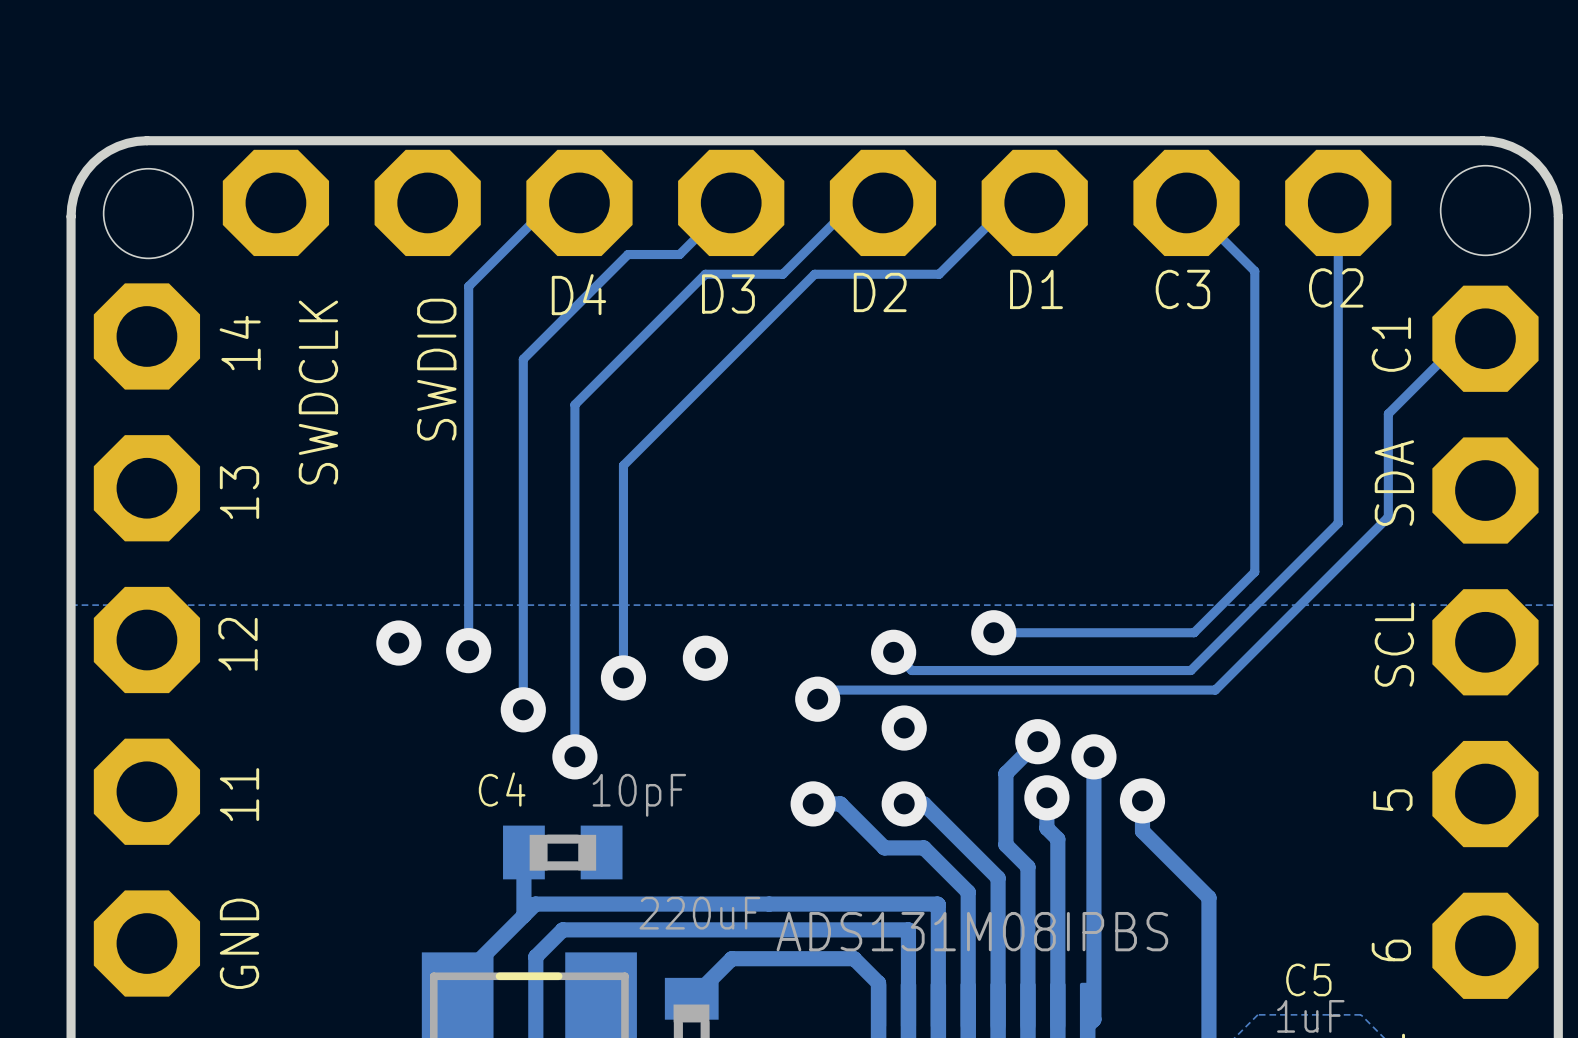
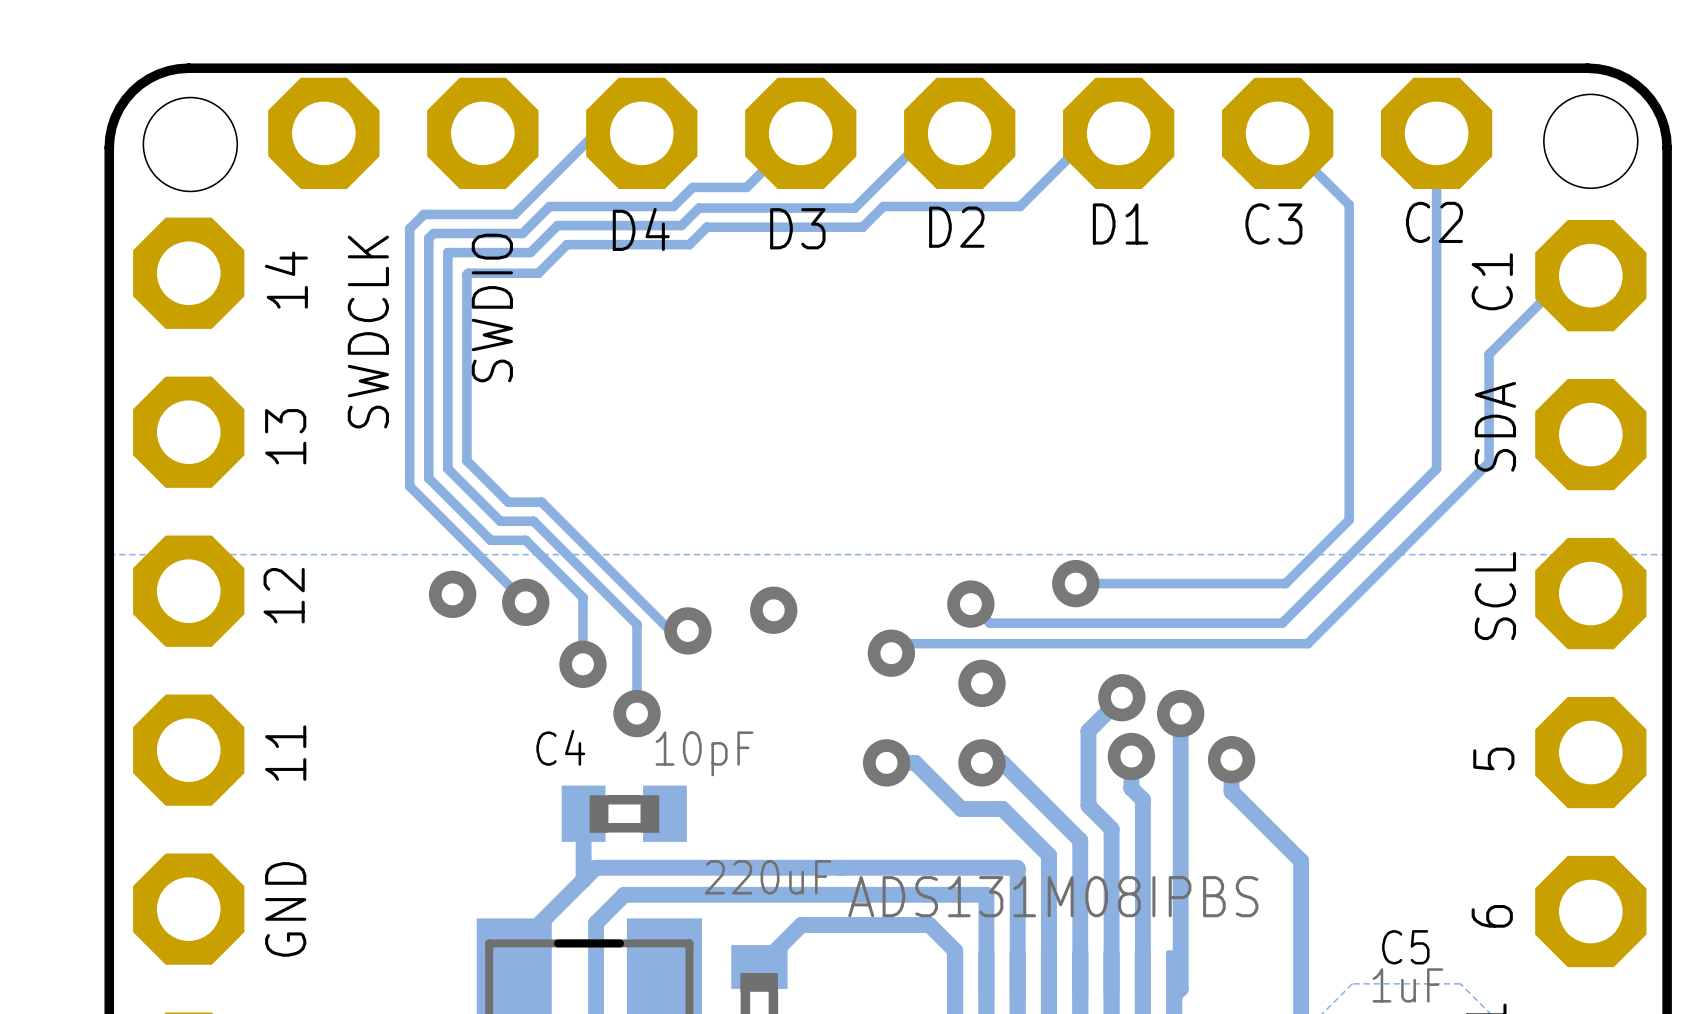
track: (552, 202) (468, 286) (468, 650) -> (613, 133) (595, 133) (514, 214) (424, 214) (409, 228) (409, 486) (525, 602)
track: (609, 272) (523, 359) (523, 646) -> (673, 206) (549, 206) (522, 233) (433, 233) (428, 238) (428, 478) (490, 540) (525, 540) (582, 597)
track: (940, 272) (814, 274) (623, 465) (623, 677) -> (1020, 206) (883, 206) (862, 227) (706, 227) (689, 244) (567, 244) (538, 273) (468, 273) (466, 274) (466, 460) (508, 502) (541, 502) (670, 630) (687, 630)
track: (705, 274) (574, 404) (574, 671) -> (773, 208) (699, 208) (681, 225) (557, 225) (530, 252) (447, 252) (447, 468) (500, 521) (533, 521) (637, 624)

